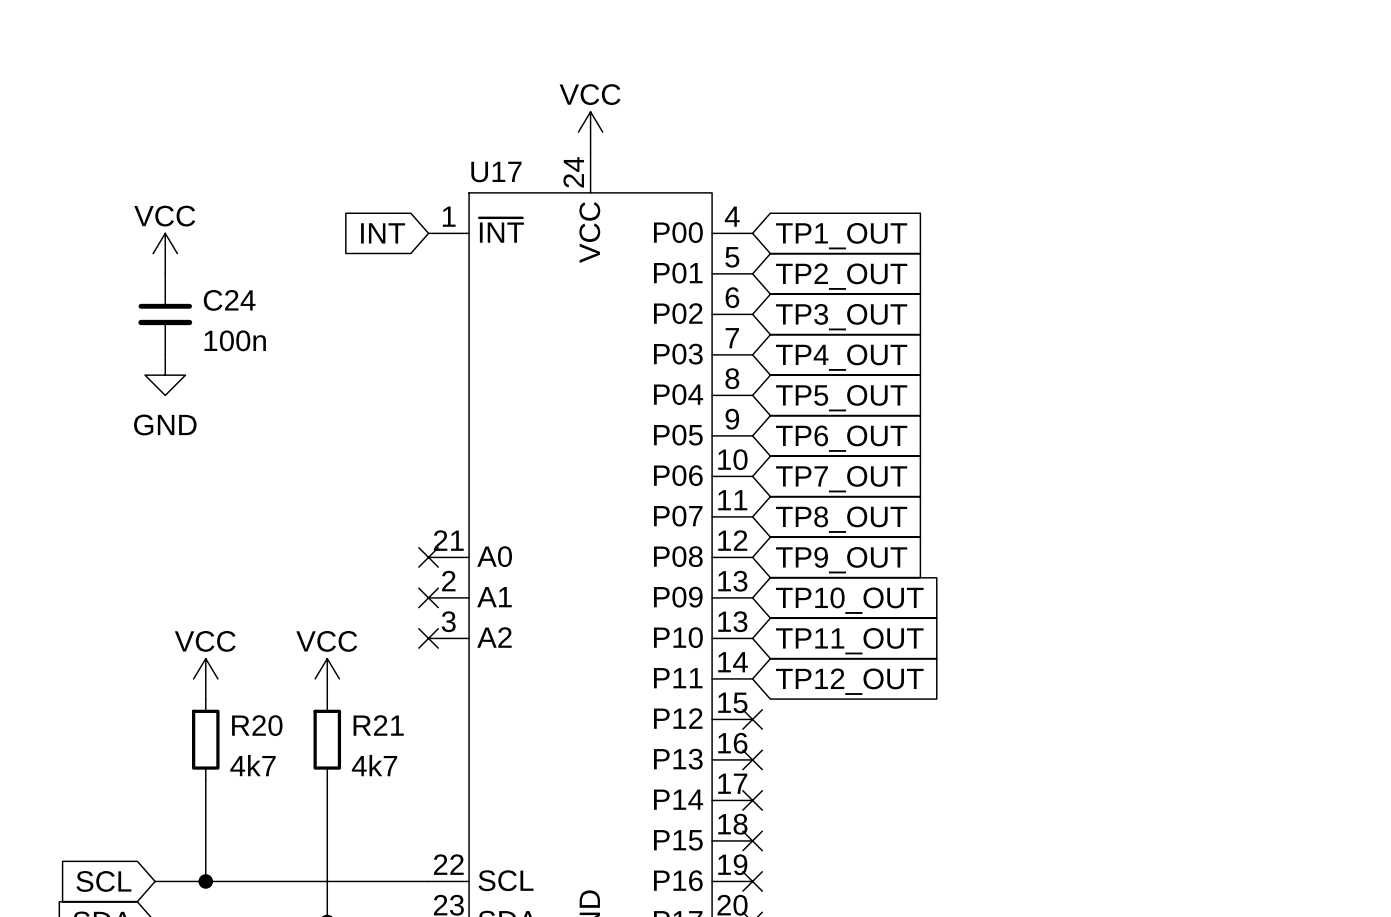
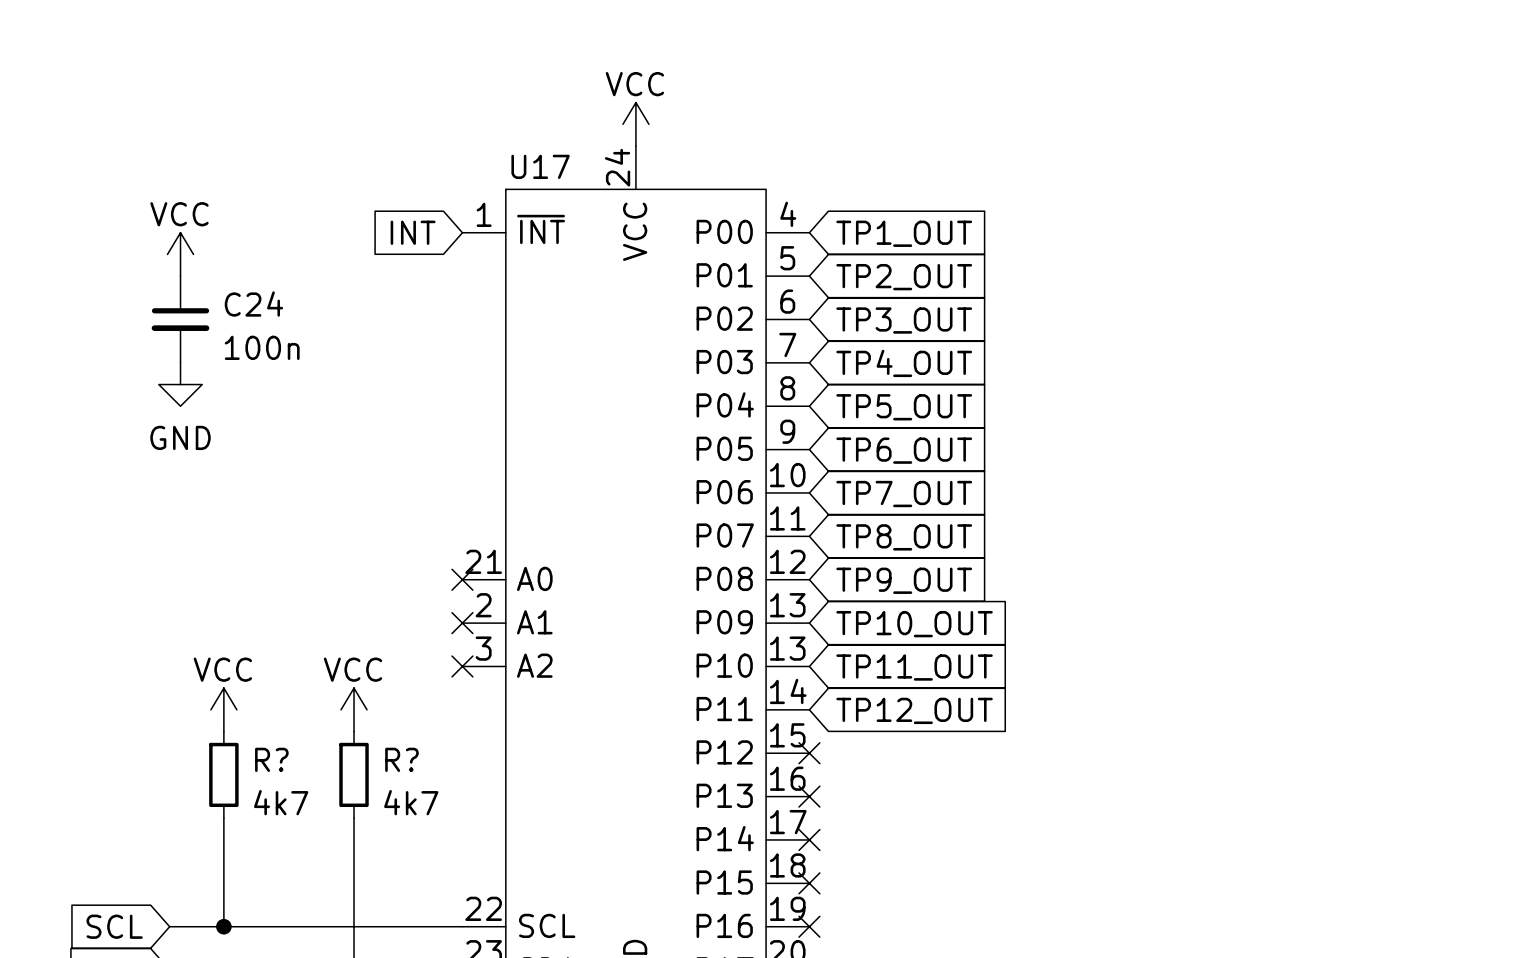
R20 name: R20 (257, 725) -> R? (271, 759)
R21 name: R21 (378, 725) -> R? (401, 759)

